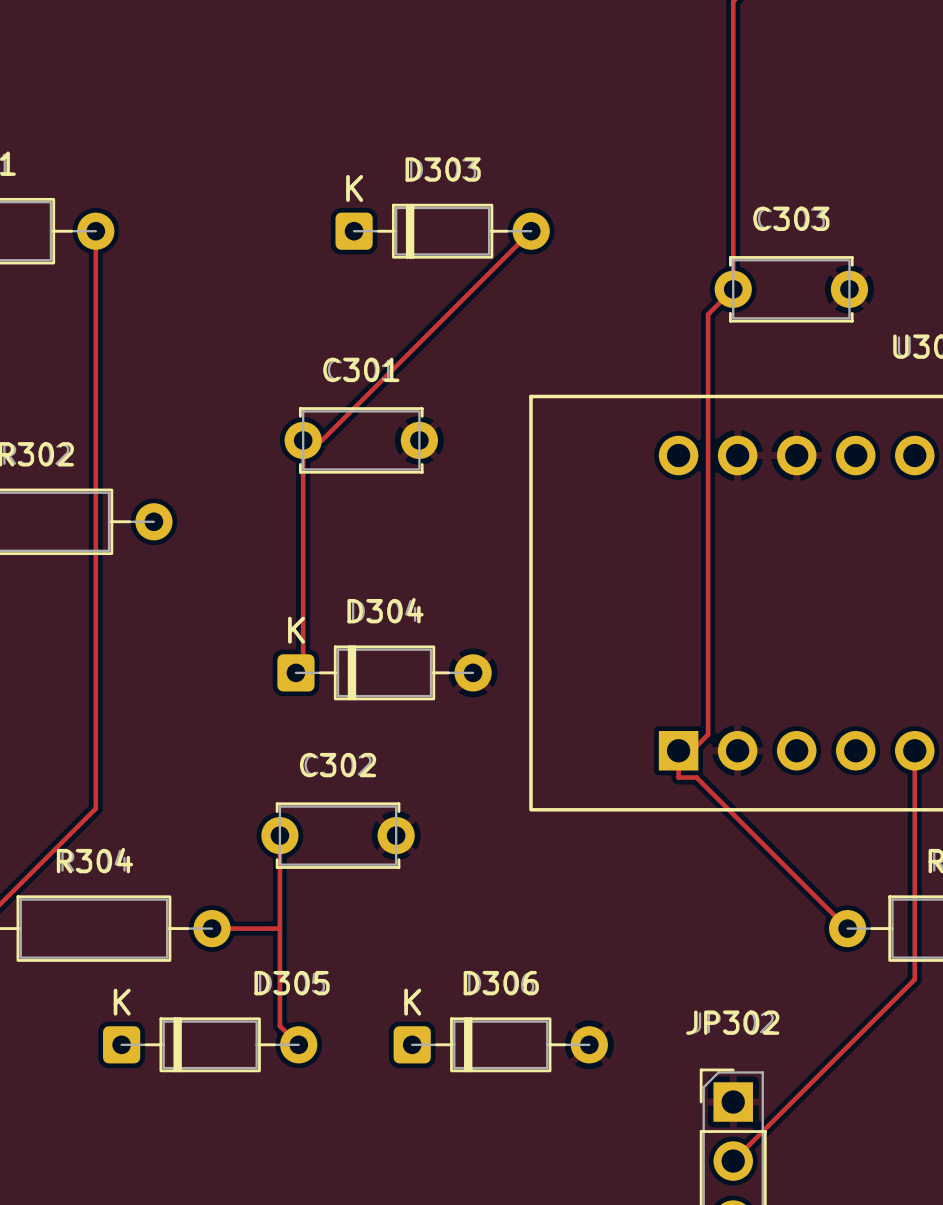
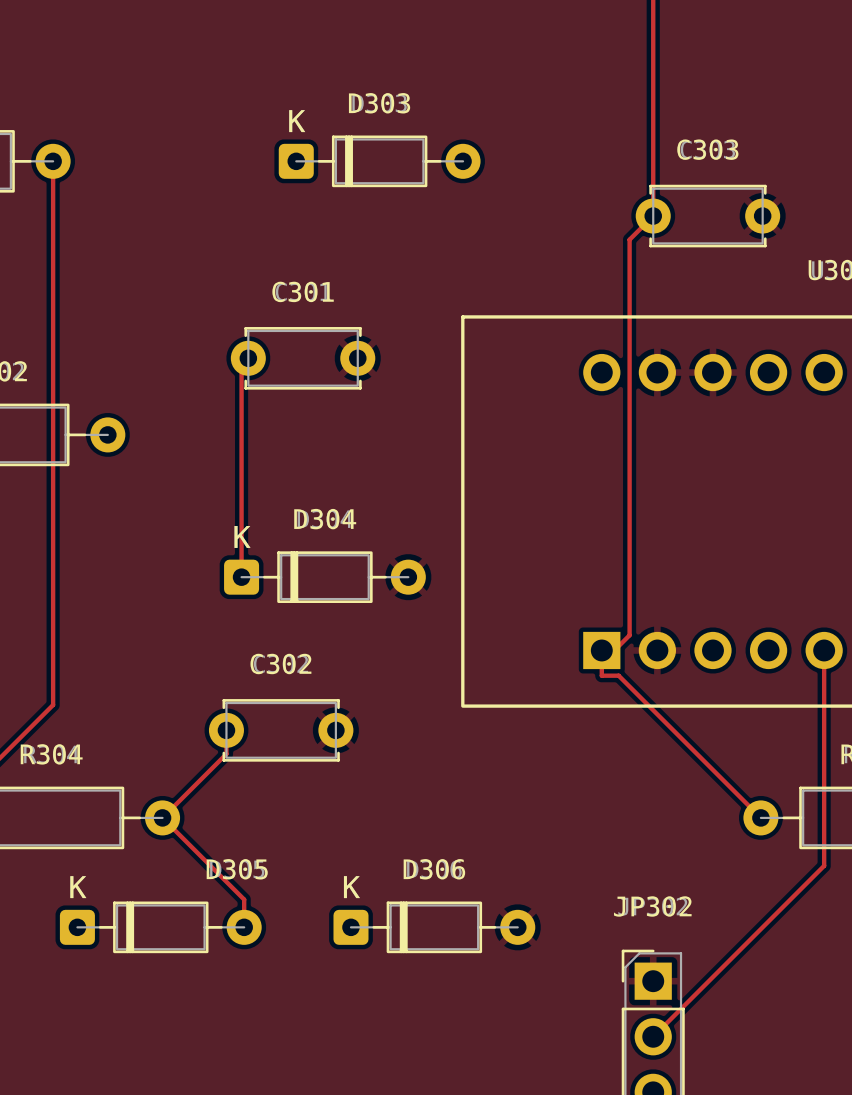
track: (531, 231) (322, 440) (303, 440) (303, 665) (295, 672) -> (248, 358) (241, 365) (241, 577)
track: (279, 860) (279, 1026) (298, 1044) -> (226, 754) (162, 817) (244, 899) (244, 927)
track: (212, 928) (279, 928) -> none

